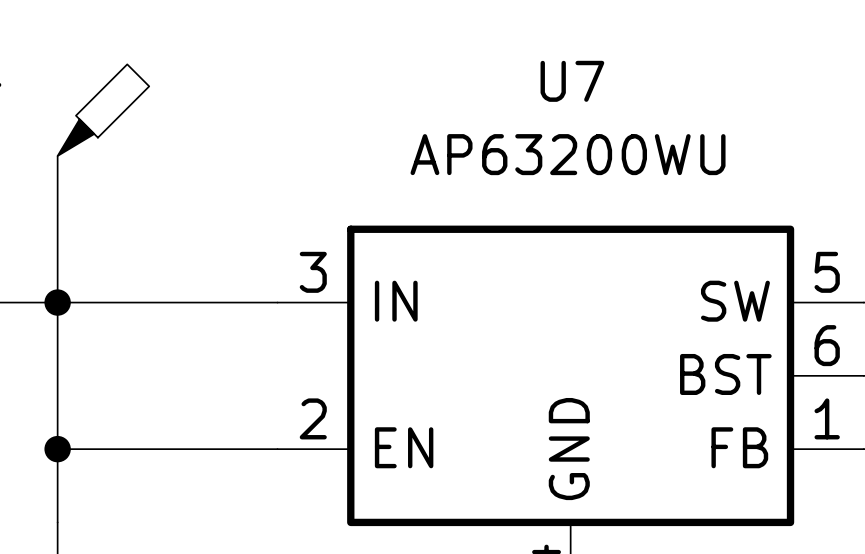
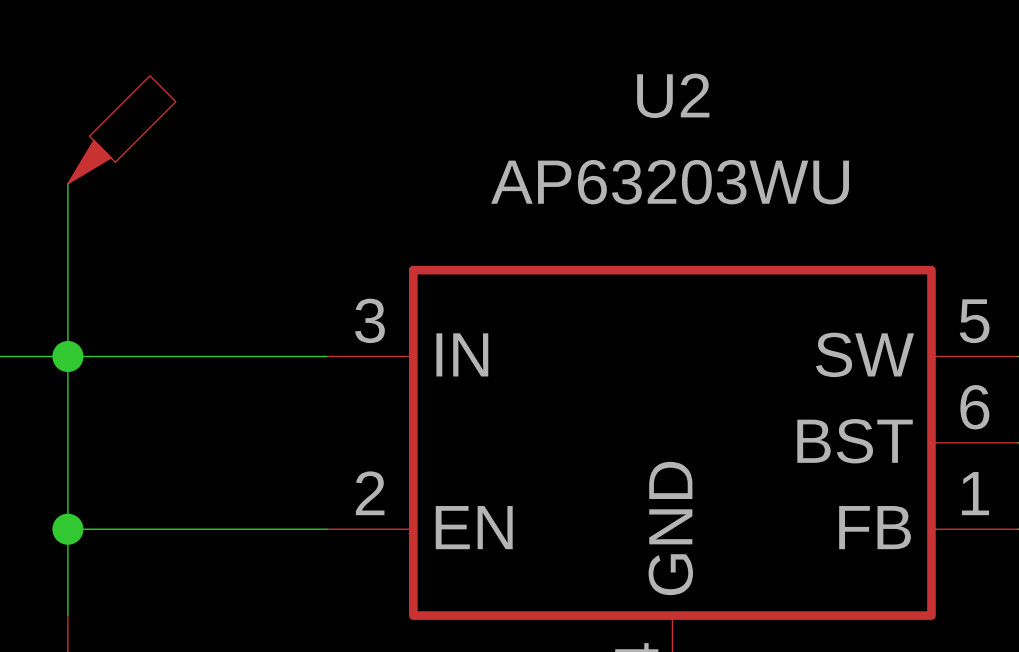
U7 name: U7 (572, 81) -> U2 (673, 95)
U7 value: AP63200WU (568, 154) -> AP63203WU (670, 182)

